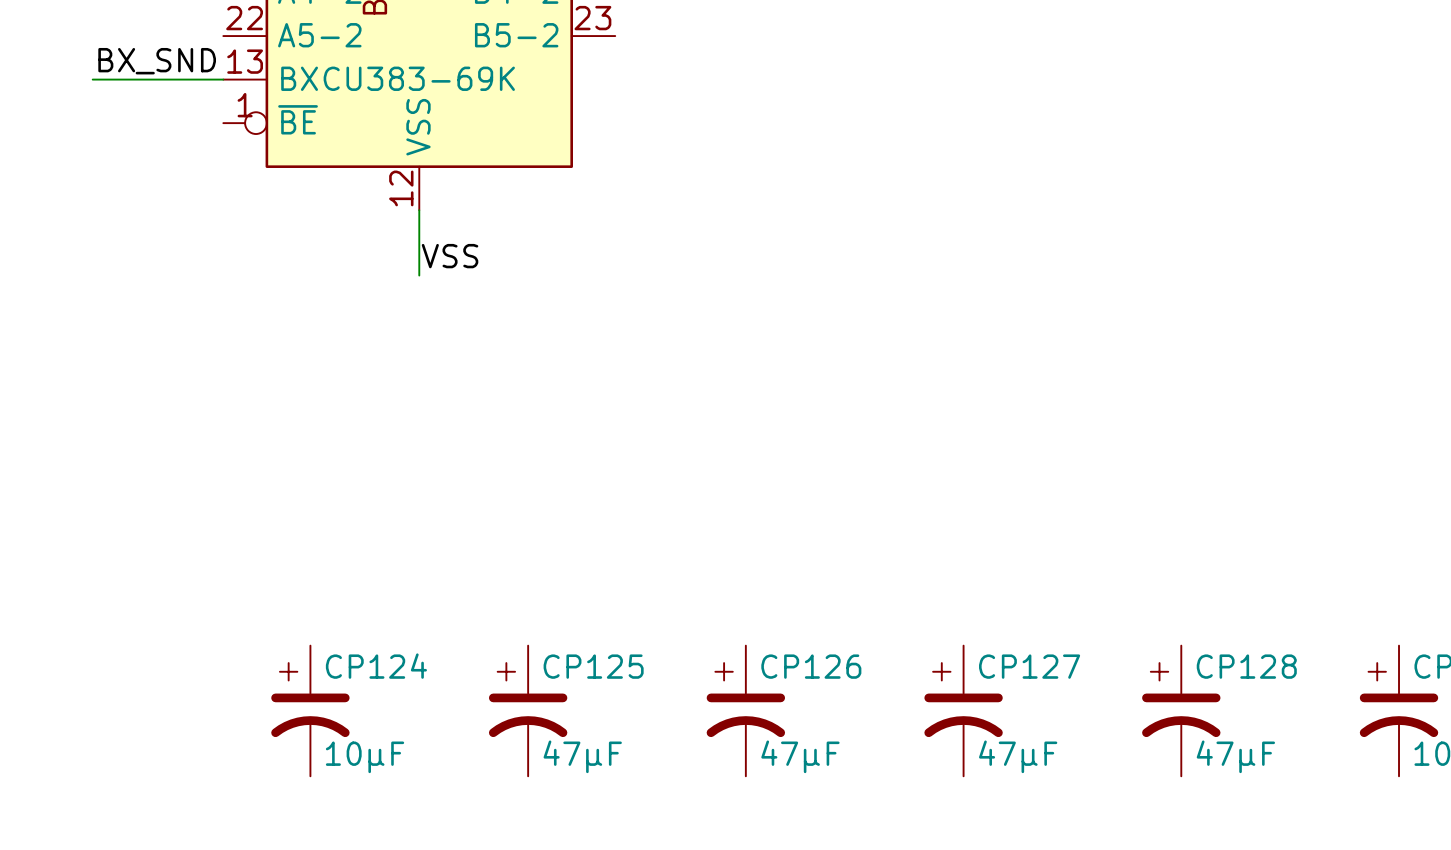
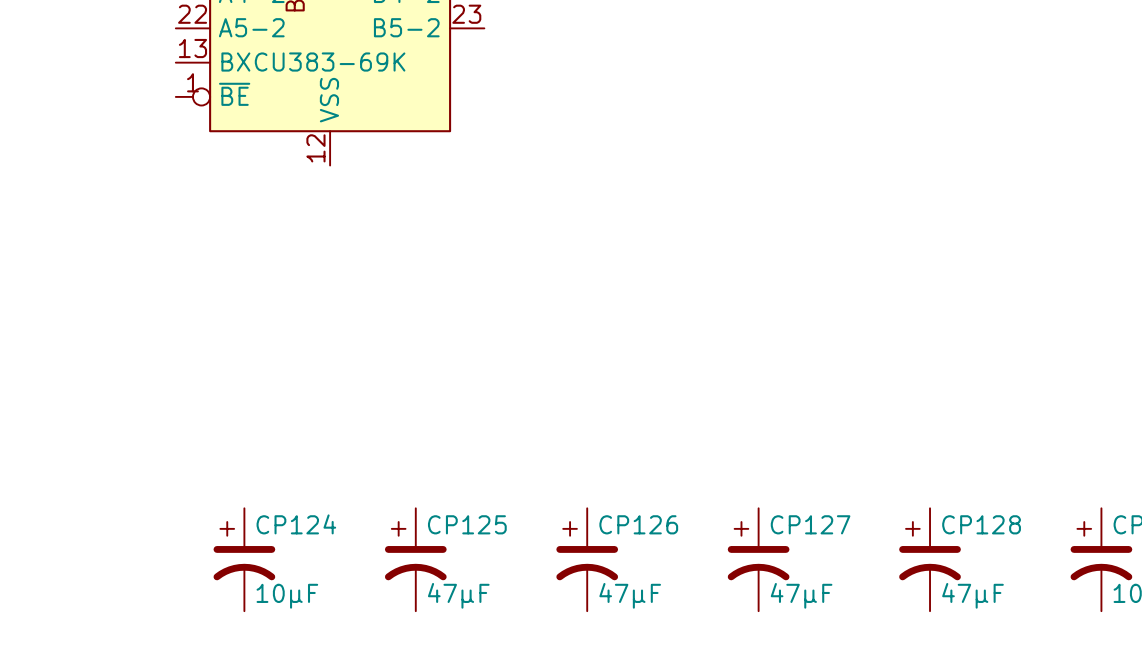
label: BX_SND (157, 61) -> none
wire: (92, 79) (223, 79) -> none
wire: (419, 210) (419, 275) -> none
label: VSS (450, 256) -> none

